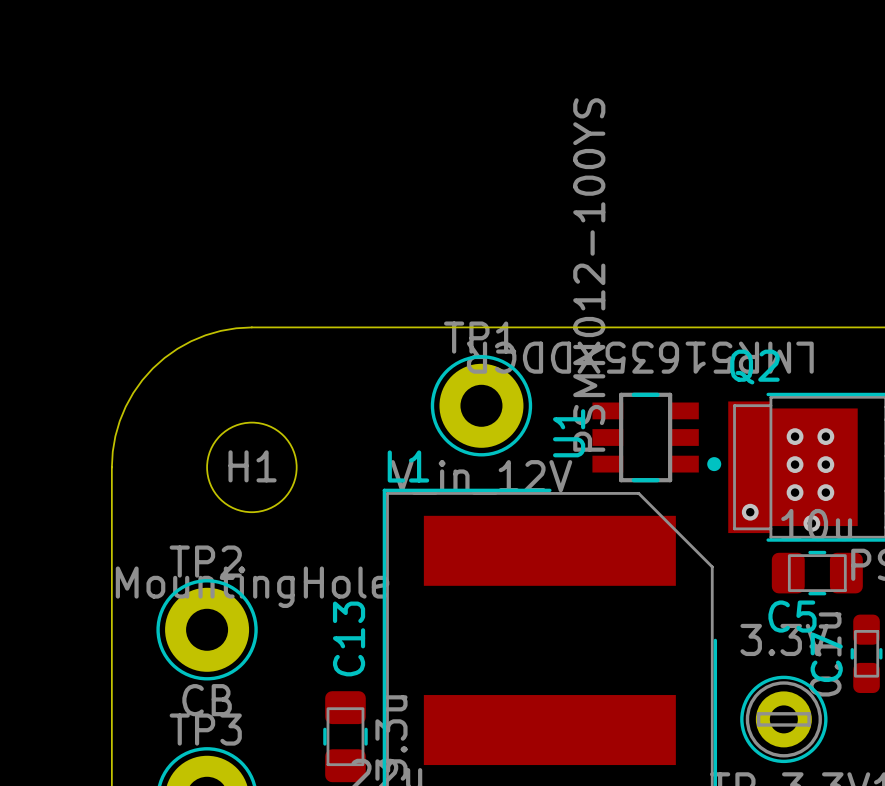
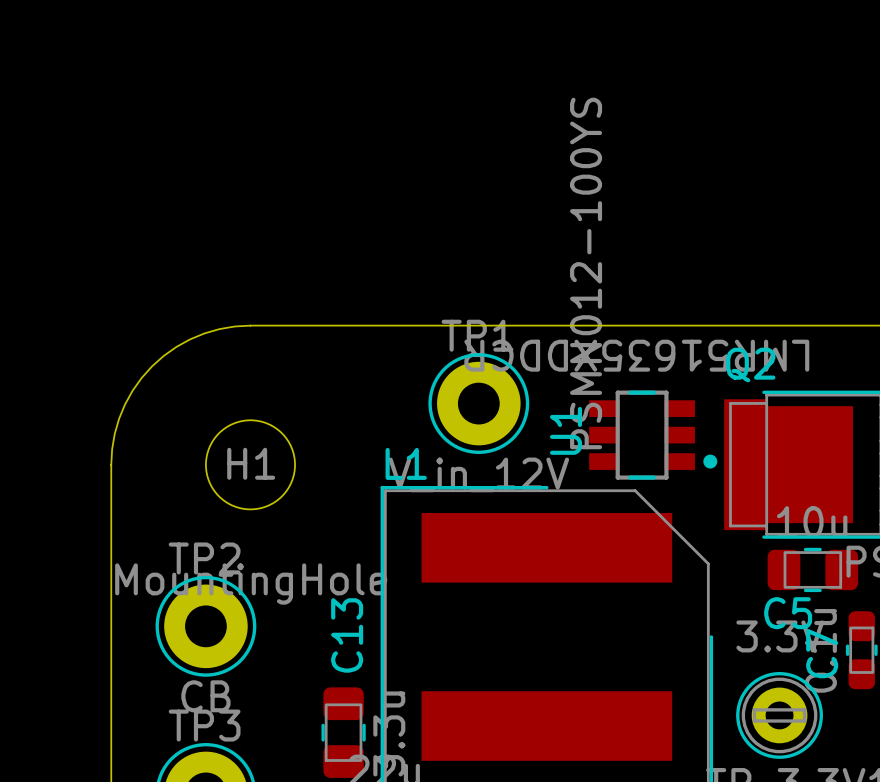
via: (795, 436) -> none
via: (825, 436) -> none
via: (795, 464) -> none
via: (825, 464) -> none
via: (795, 492) -> none
via: (825, 492) -> none
via: (750, 512) -> none
via: (811, 523) -> none

